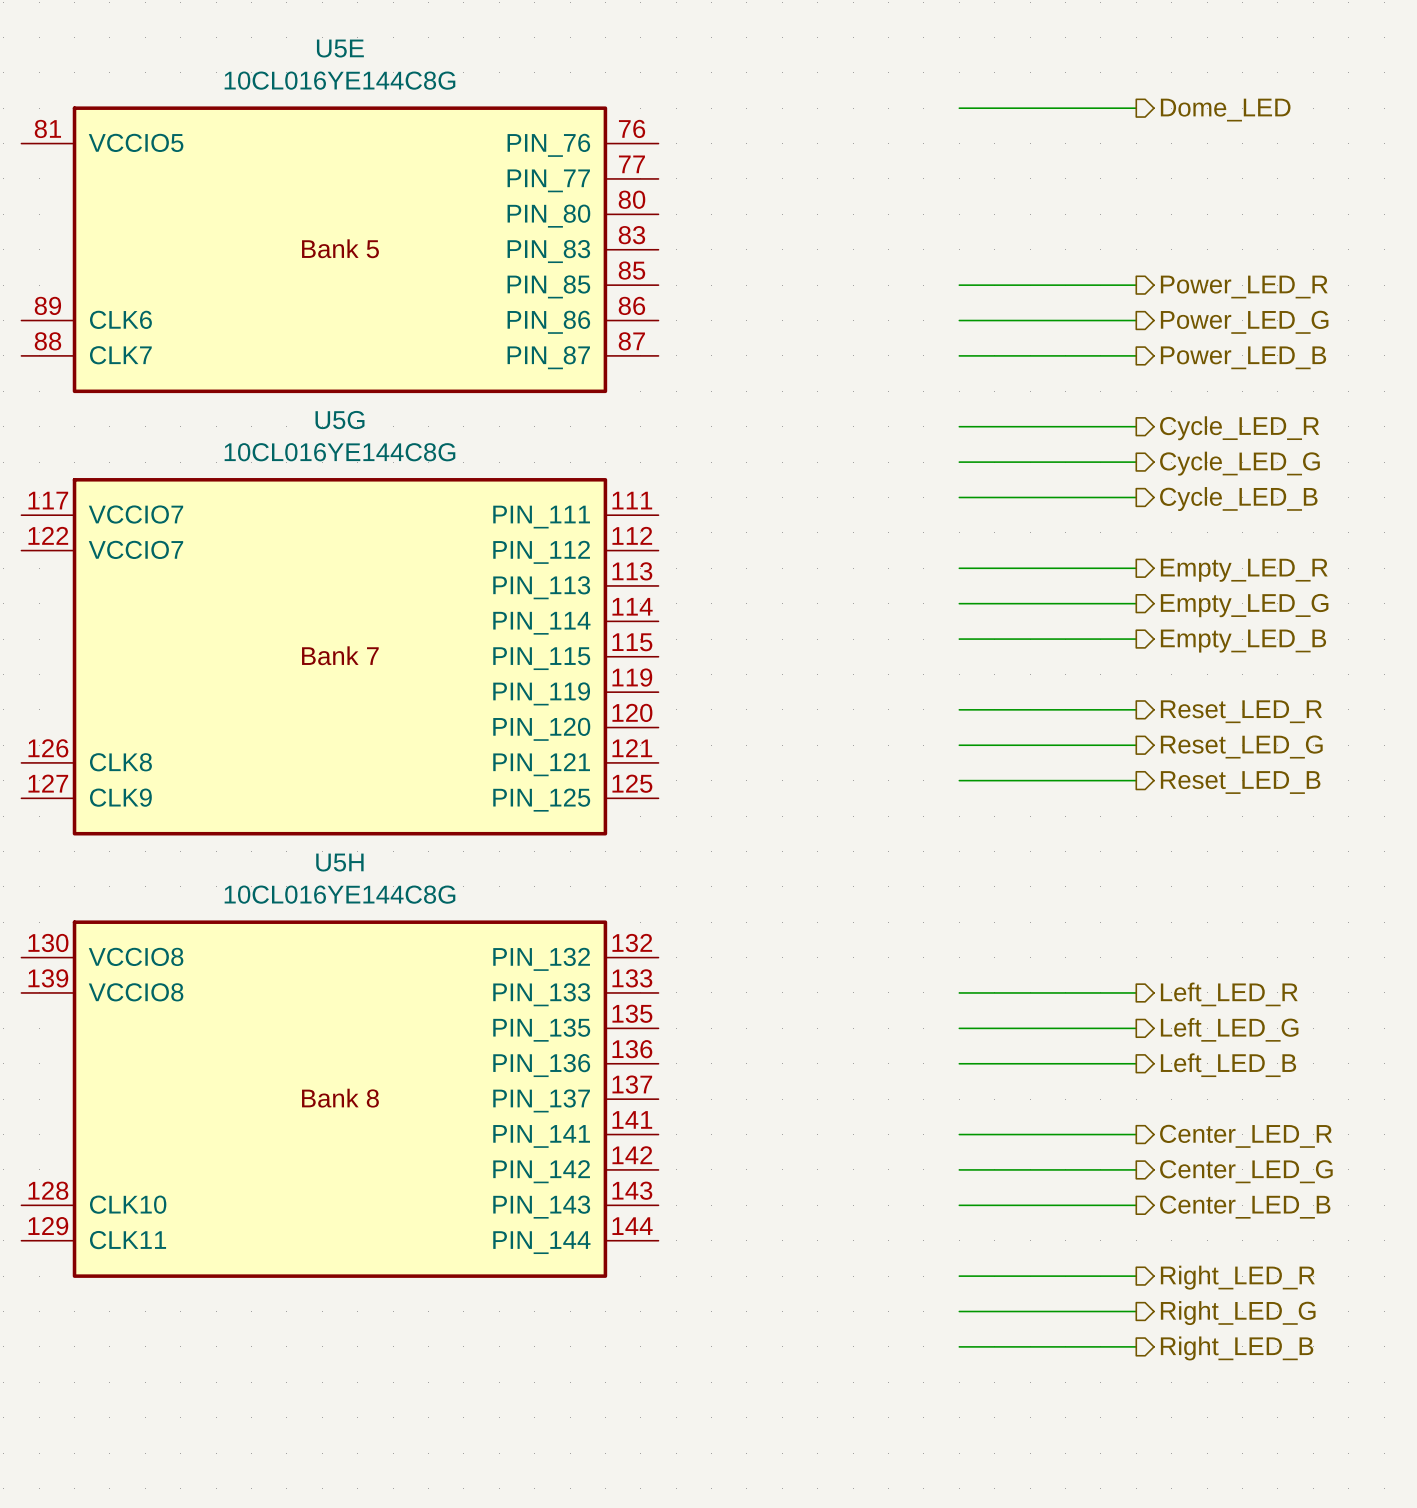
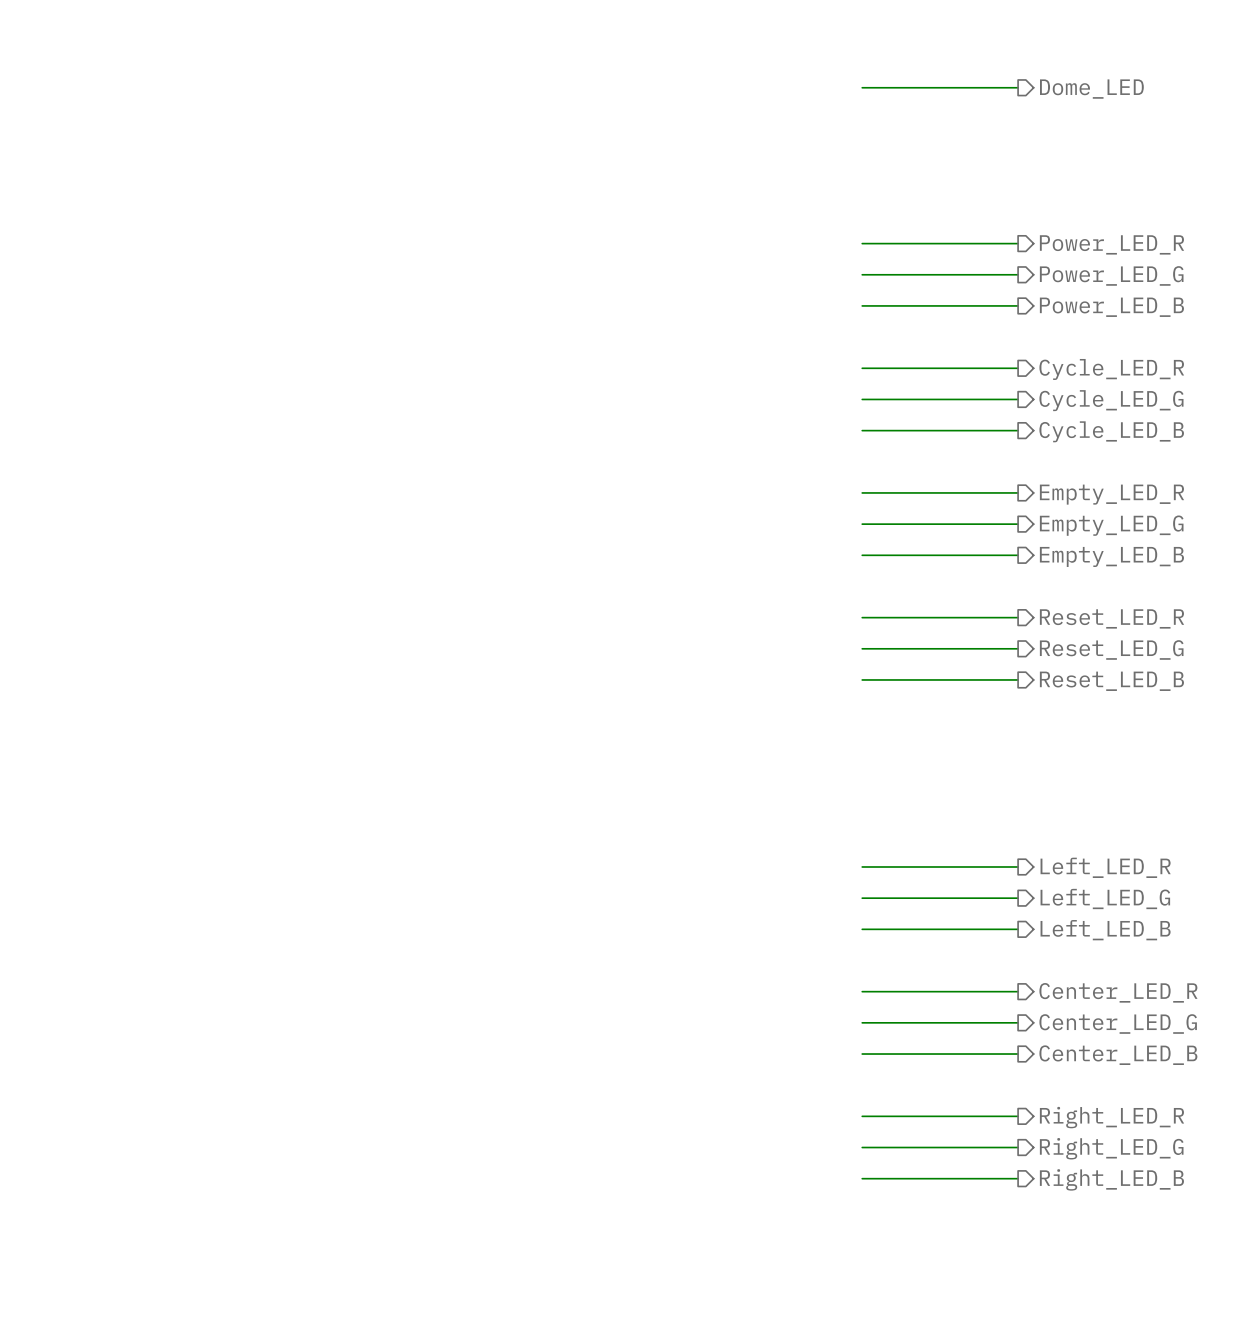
U5E: 10CL016YE144C8G (339, 249) -> none
U5G: 10CL016YE144C8G (339, 656) -> none
U5H: 10CL016YE144C8G (339, 1099) -> none

